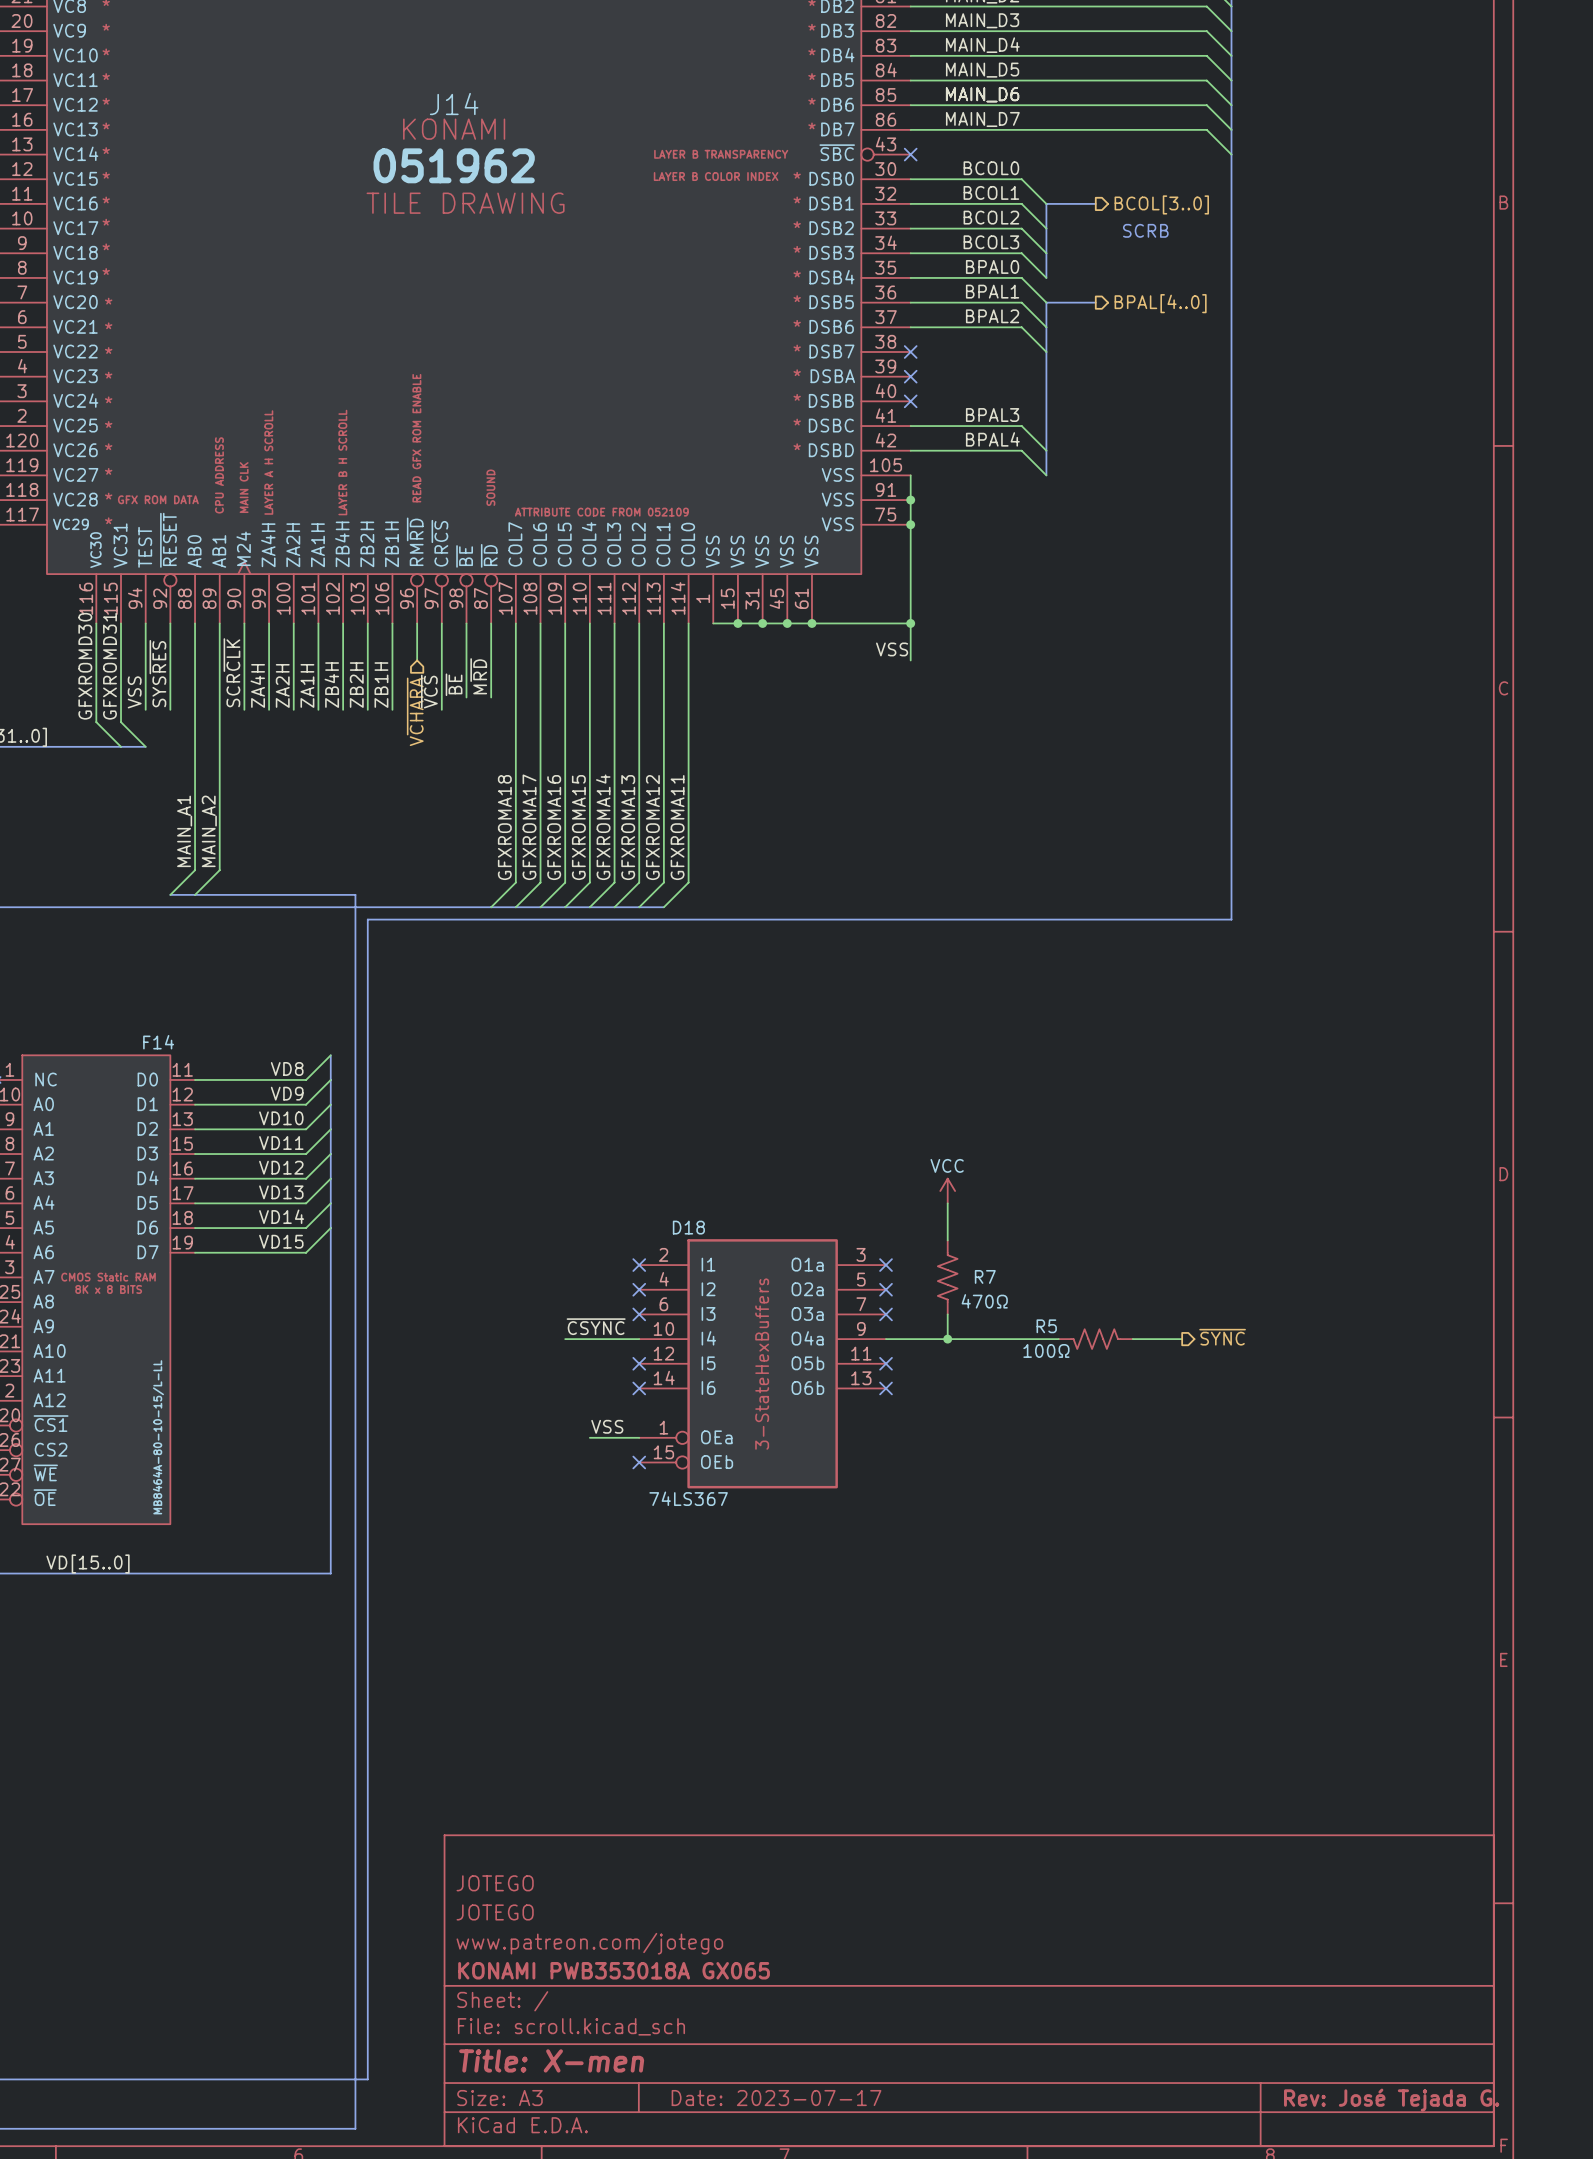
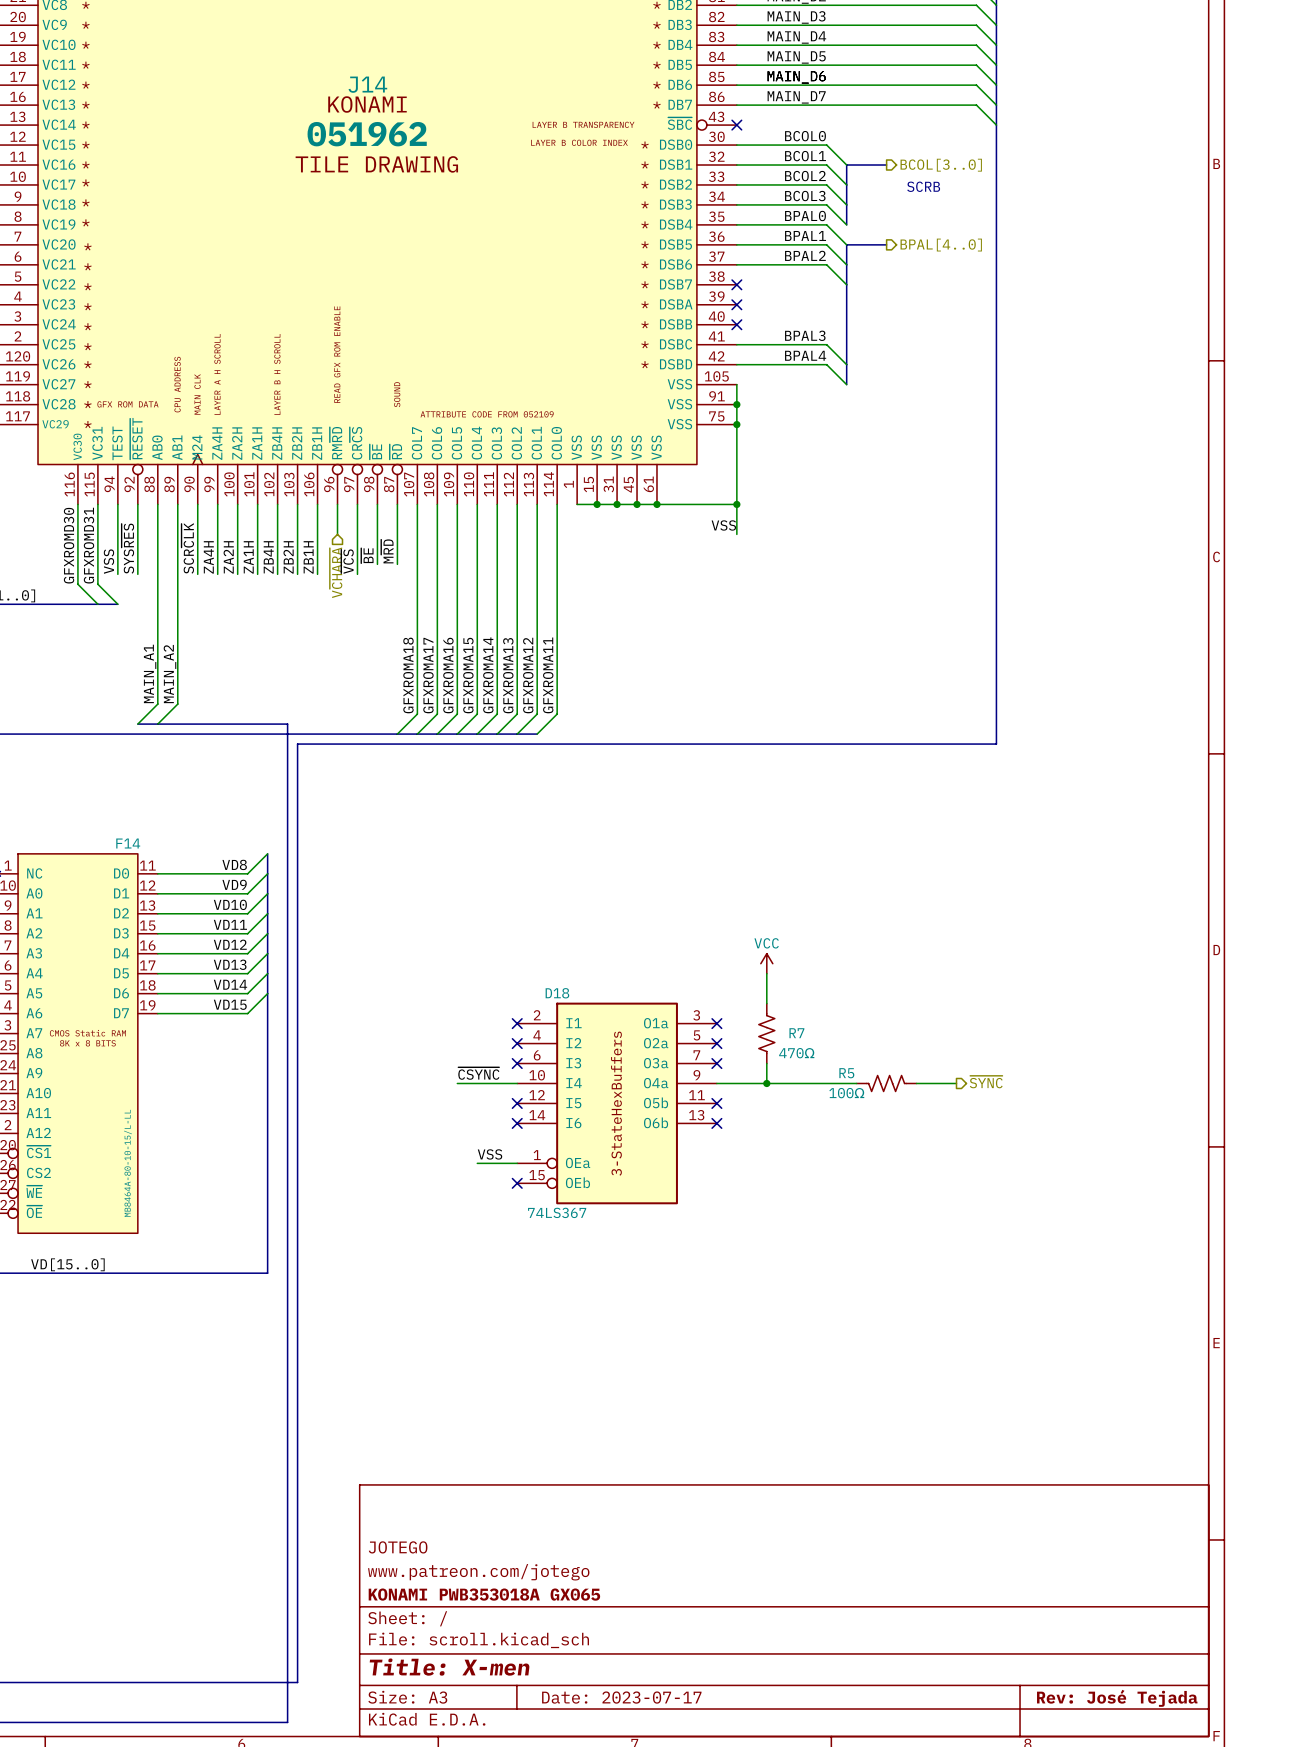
title block: JOTEGO (495, 1883) -> none
title block: Rev: José Tejada G. (1391, 2100) -> Rev: José Tejada (1117, 1698)

